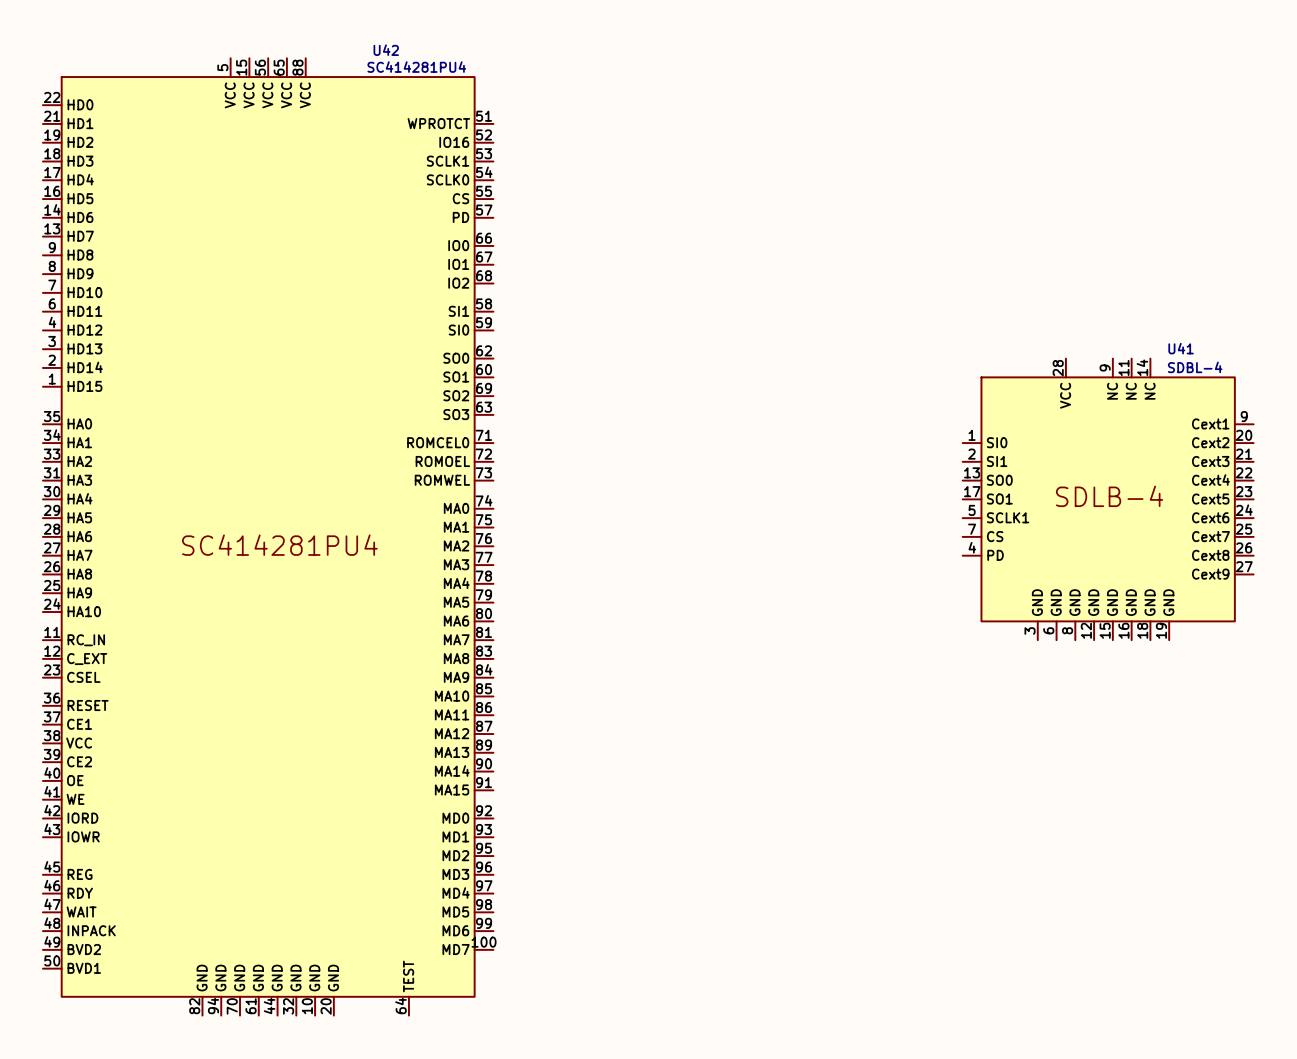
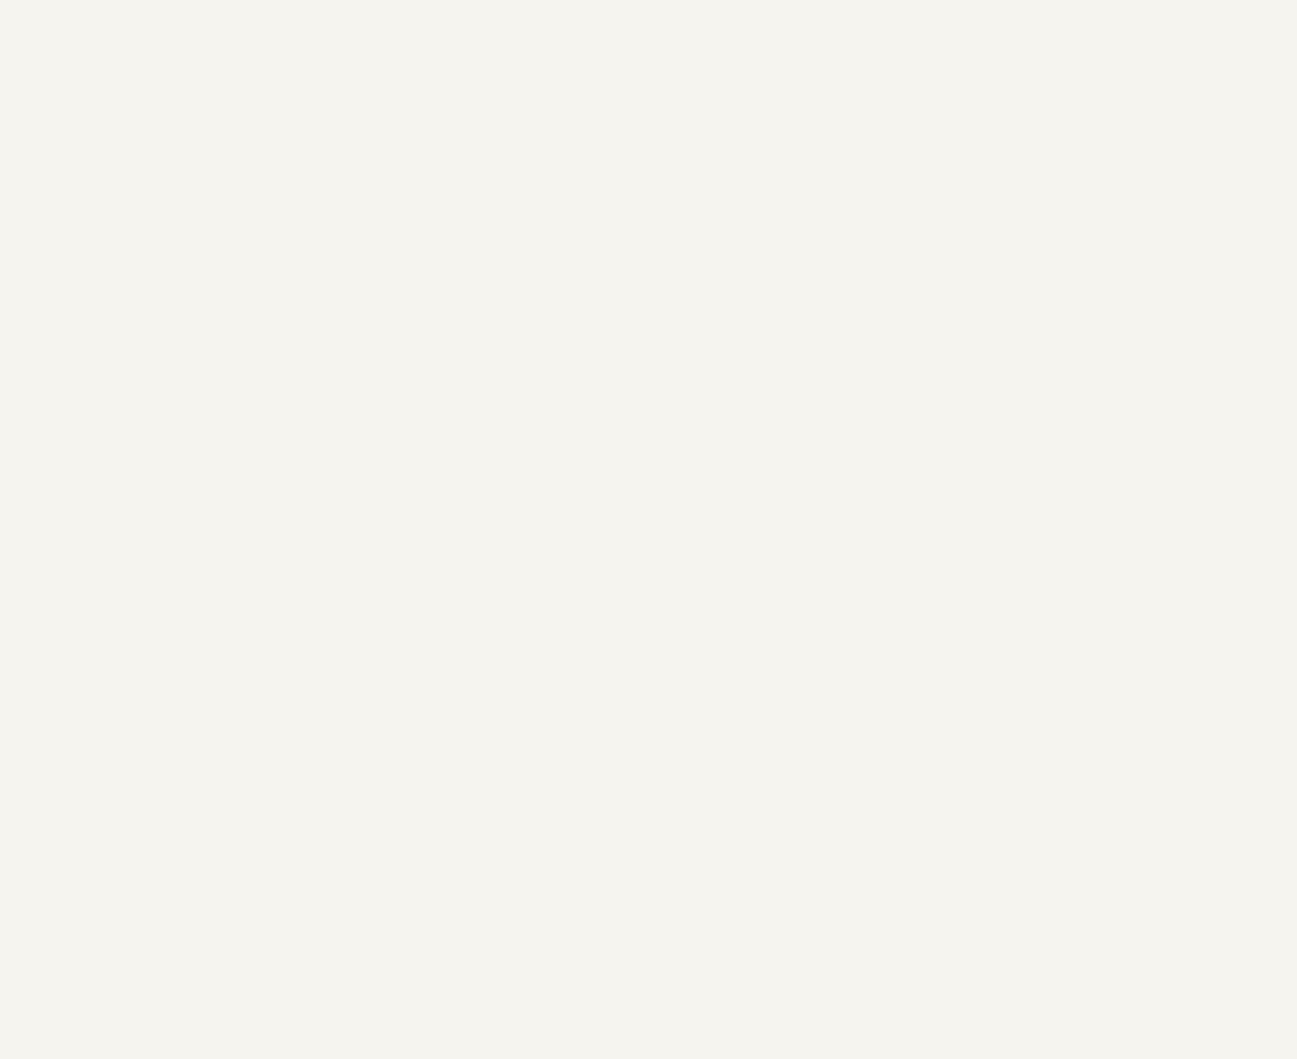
U41: SDBL-4 (1108, 499) -> none
U42: SC414281PU4 (268, 536) -> none

